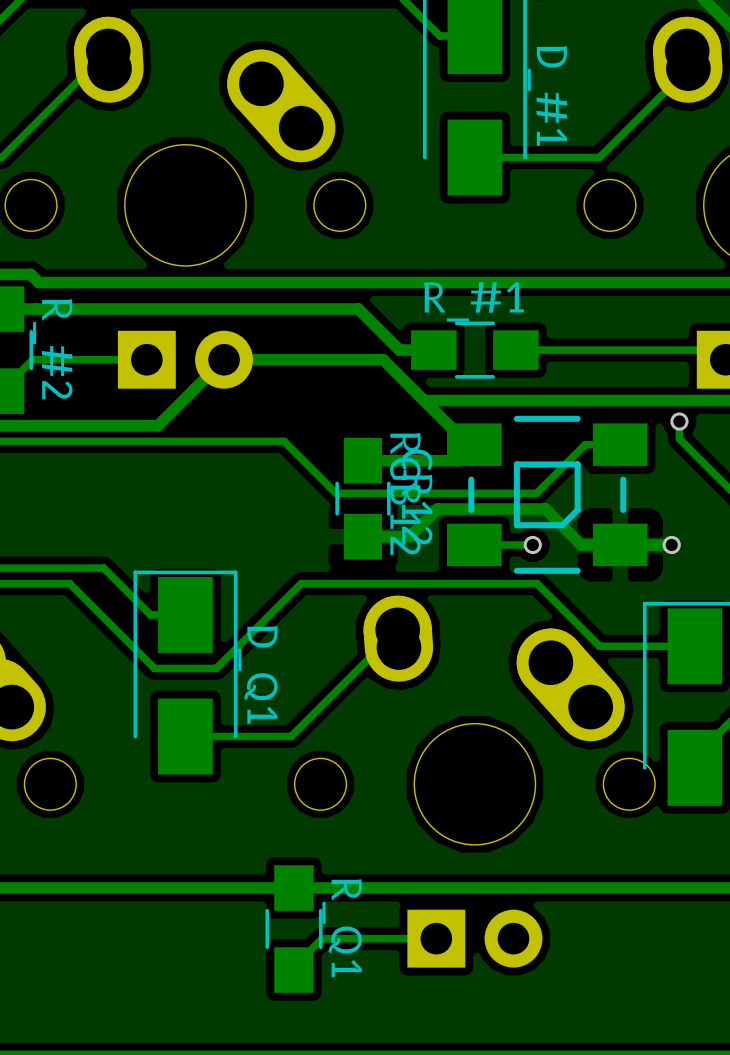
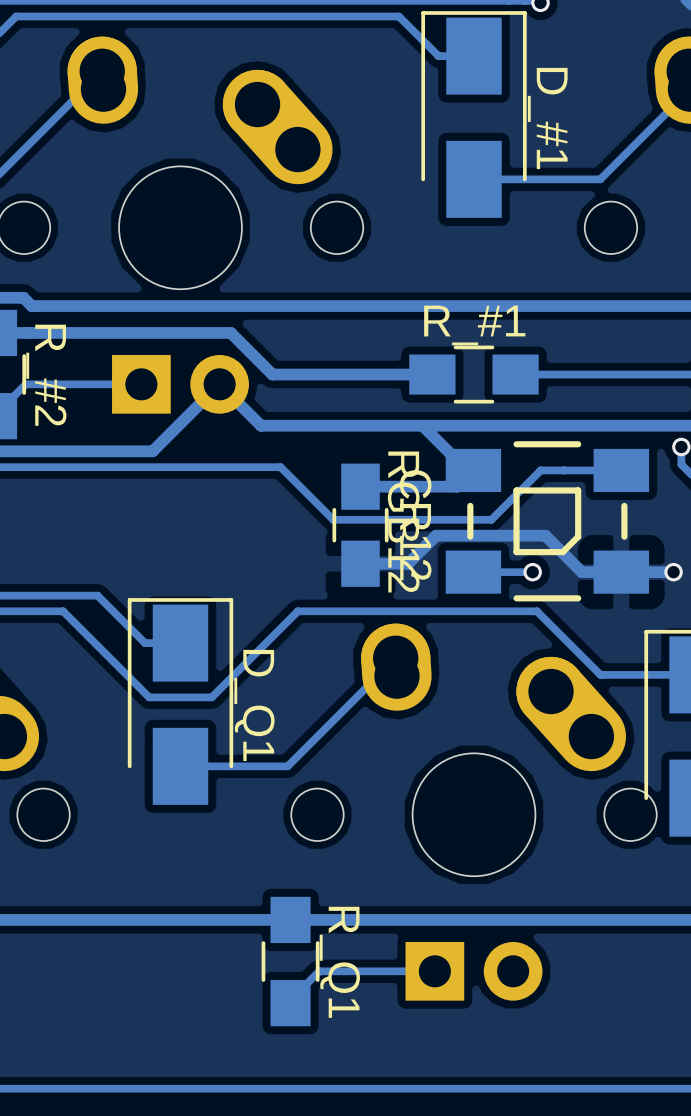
track: (235, 309) (358, 309) (399, 350) -> (230, 332) (272, 374) (397, 374)
track: (224, 359) (383, 359) (424, 401) -> (219, 384) (261, 425) (423, 425)
track: none -> (564, 470) (540, 470)
track: (585, 444) (536, 493) (492, 493) -> (540, 470) (491, 519)
track: none -> (585, 470) (564, 470)

